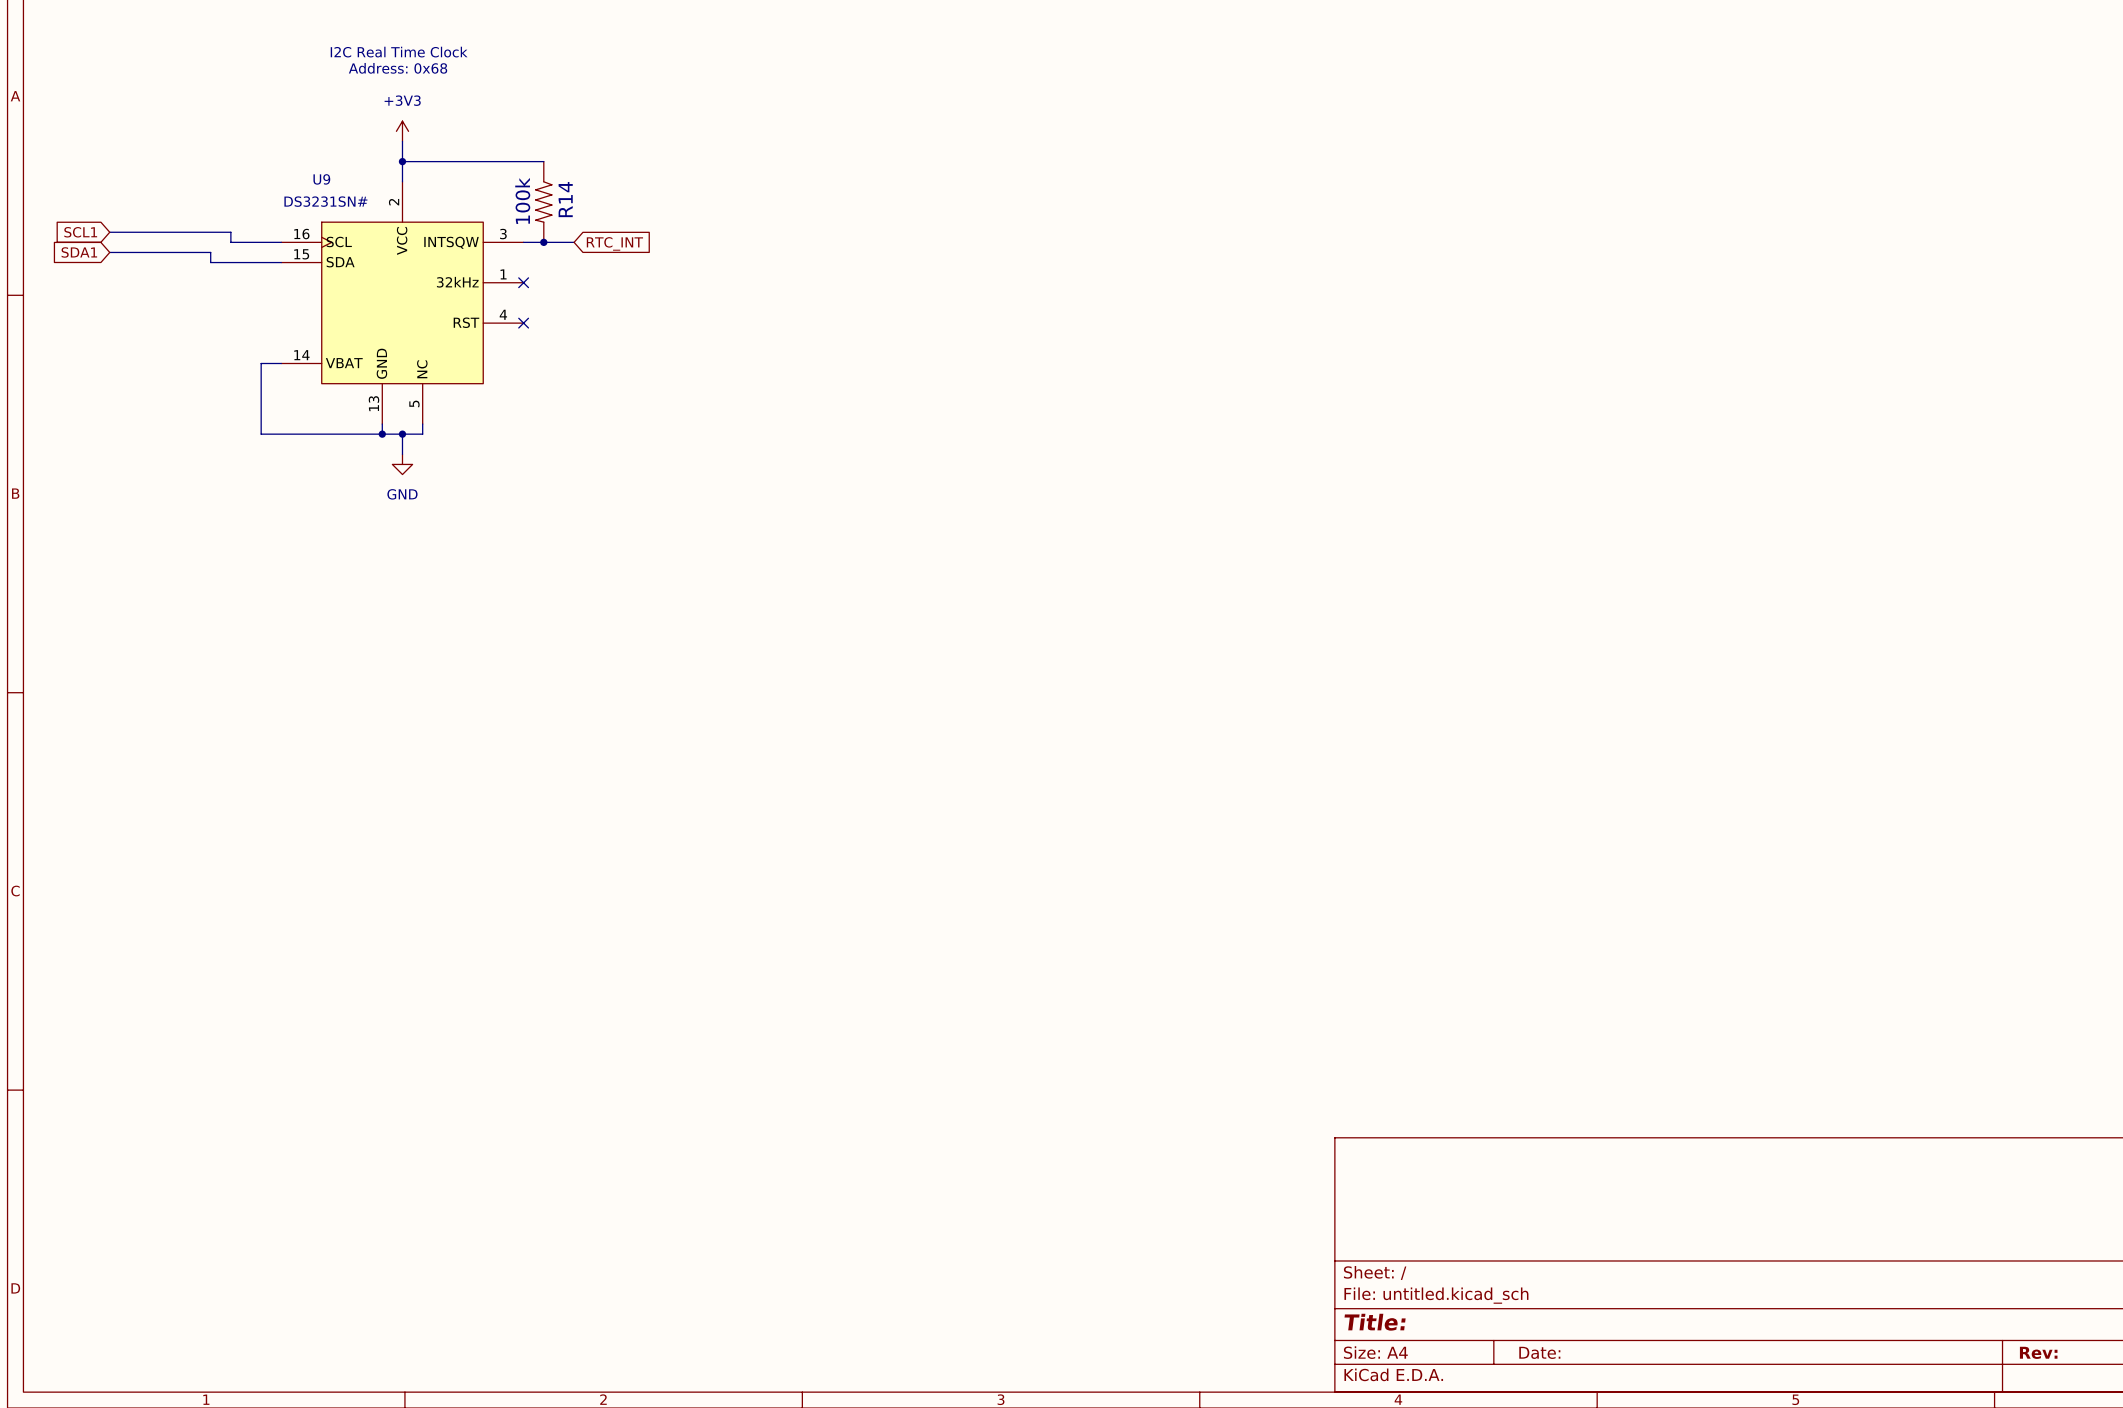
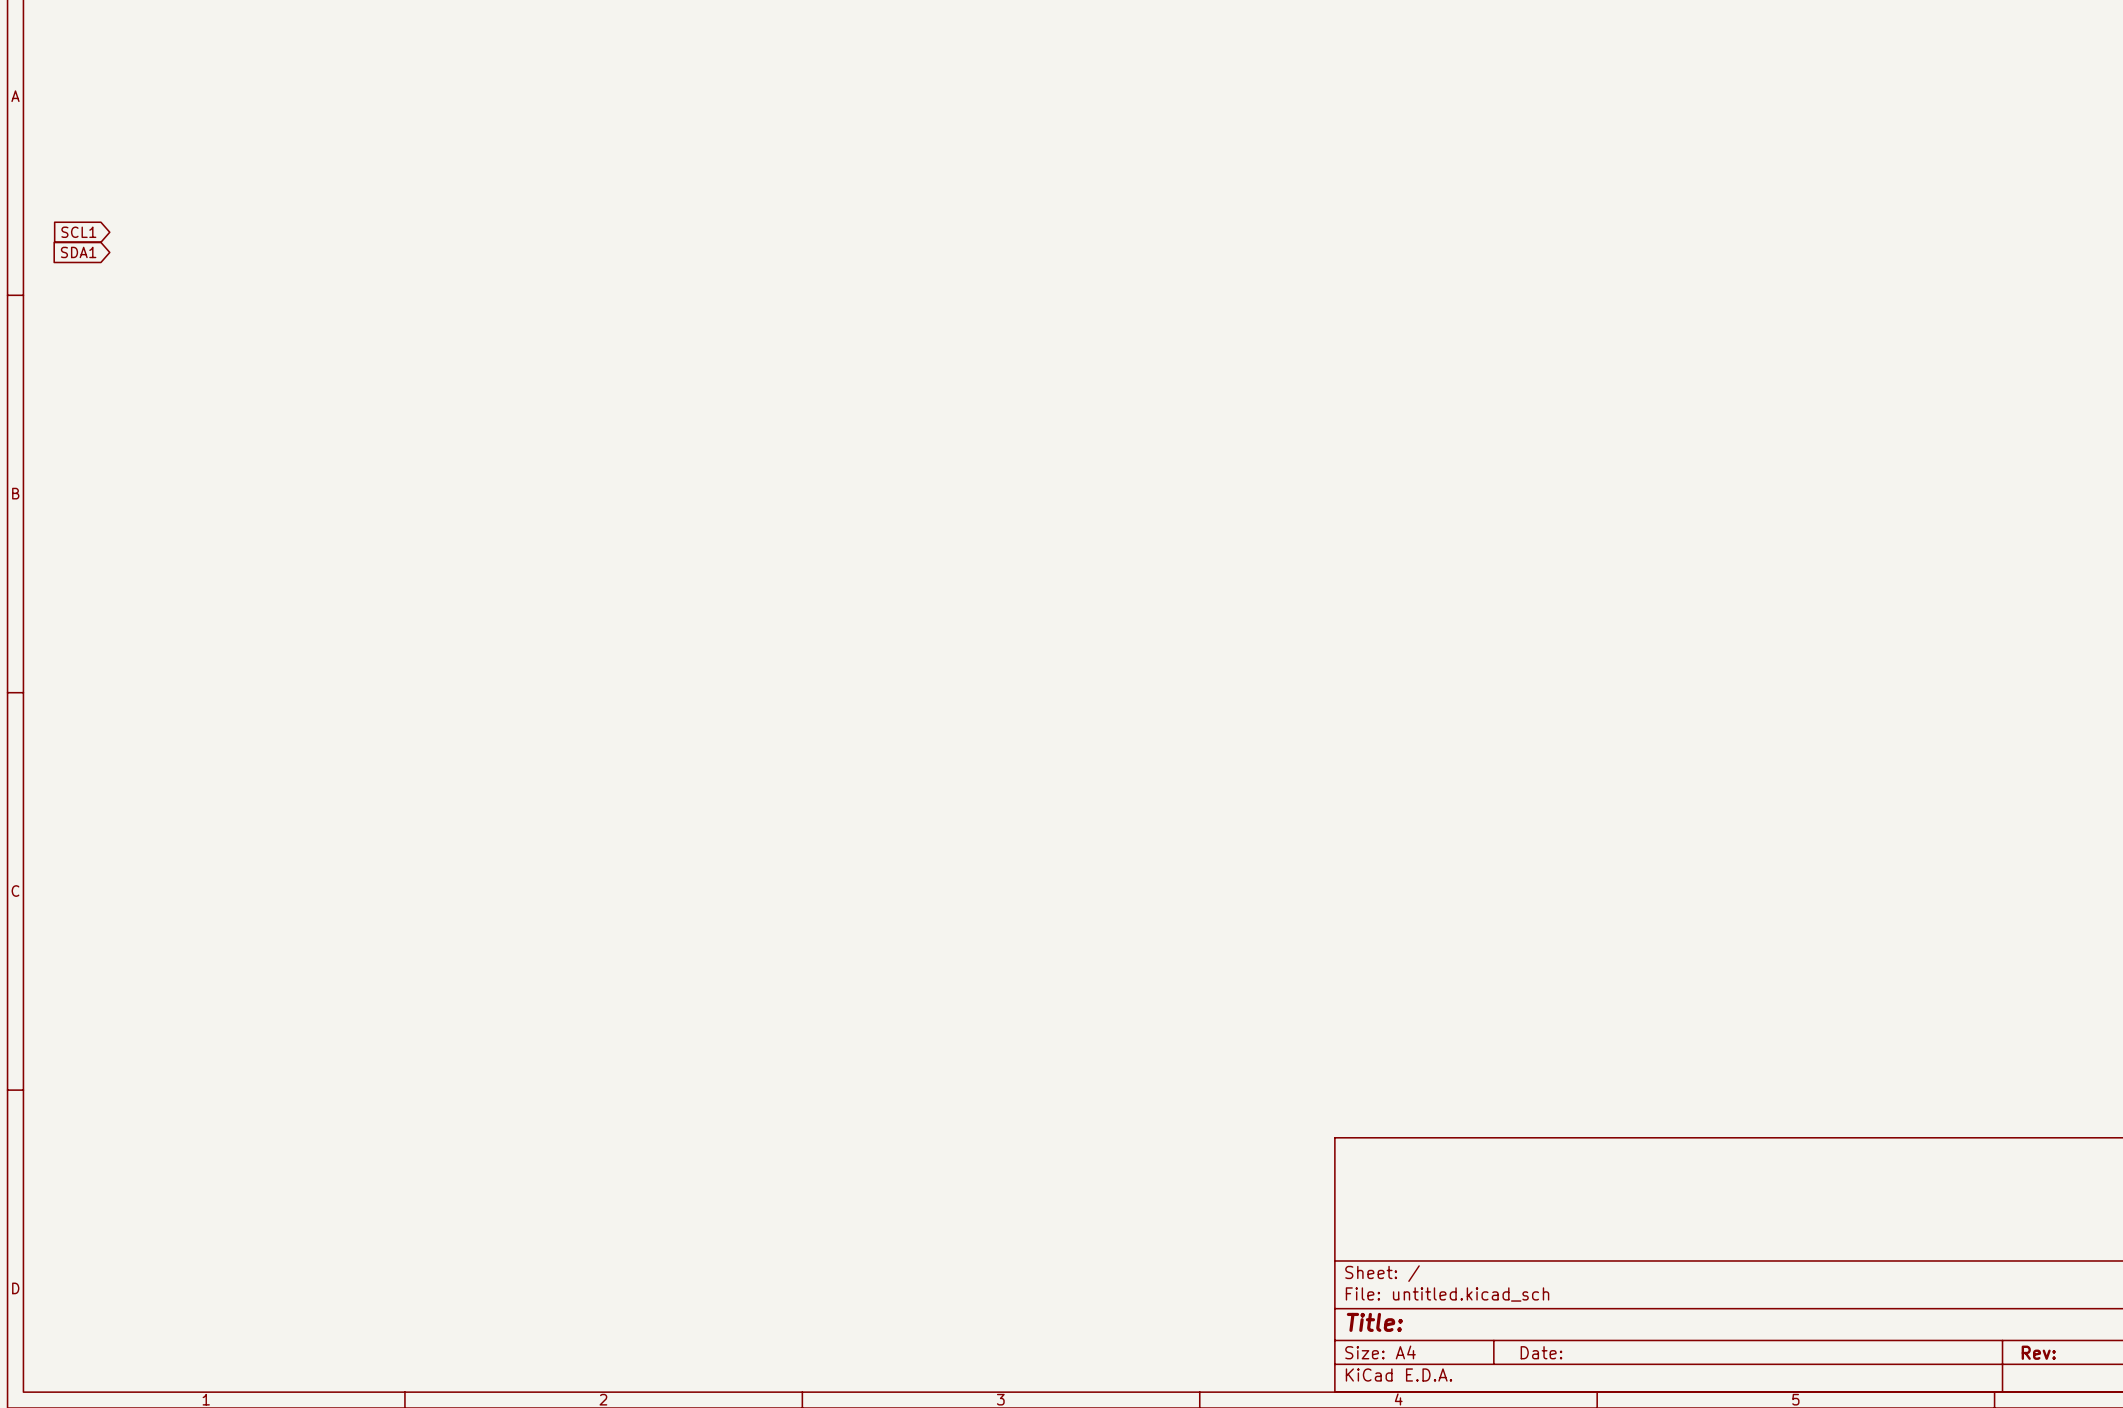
text: I2C Real Time Clock (399, 52) -> none
text: Address: 0x68 (398, 68) -> none
power symbol: +3V3 (402, 131) -> none
wire: (402, 141) (402, 181) -> none
wire: (402, 161) (543, 161) -> none
junction: (402, 161) -> none
R14: 100k (543, 201) -> none
wire: (109, 232) (230, 232) (230, 242) (281, 242) -> none
wire: (523, 242) (574, 242) -> none
junction: (543, 242) -> none
global label: RTC_INT (614, 243) -> none
wire: (109, 252) (210, 252) (210, 262) (281, 262) -> none
no-connect mark: (523, 282) -> none
U9: DS3231SN# (402, 302) -> none
no-connect mark: (523, 323) -> none
wire: (281, 363) (261, 363) (261, 434) (422, 434) (422, 424) -> none
wire: (382, 424) (382, 434) -> none
junction: (382, 434) -> none
wire: (402, 434) (402, 454) -> none
junction: (402, 434) -> none
power symbol: GND (402, 464) -> none

